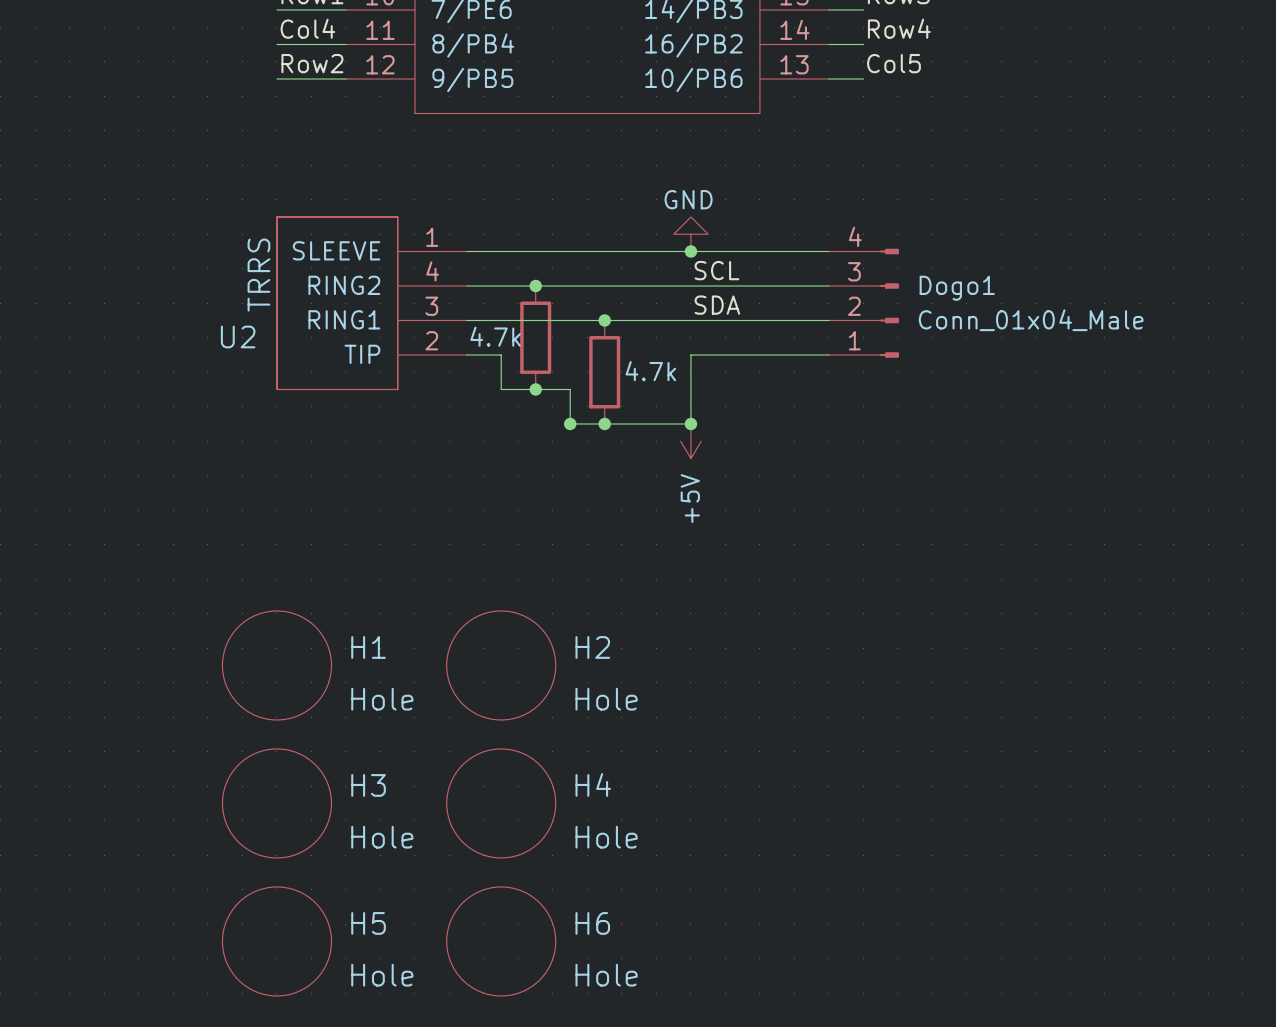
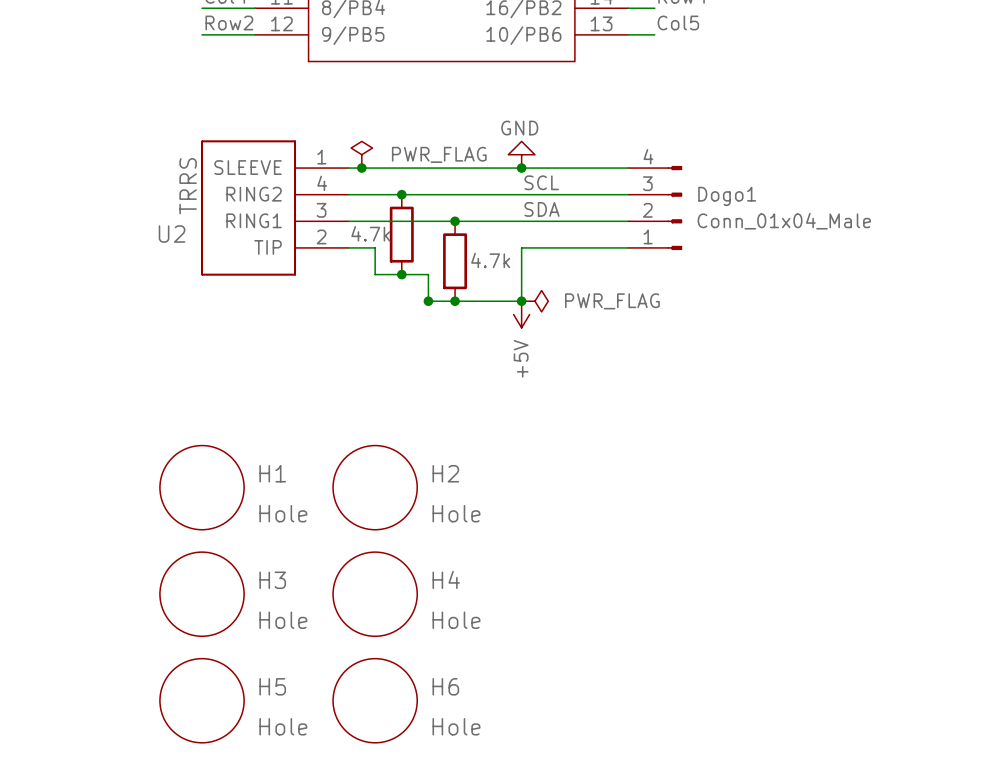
power symbol: none -> PWR_FLAG (361, 154)
junction: none -> (361, 168)
power symbol: none -> PWR_FLAG (534, 301)

